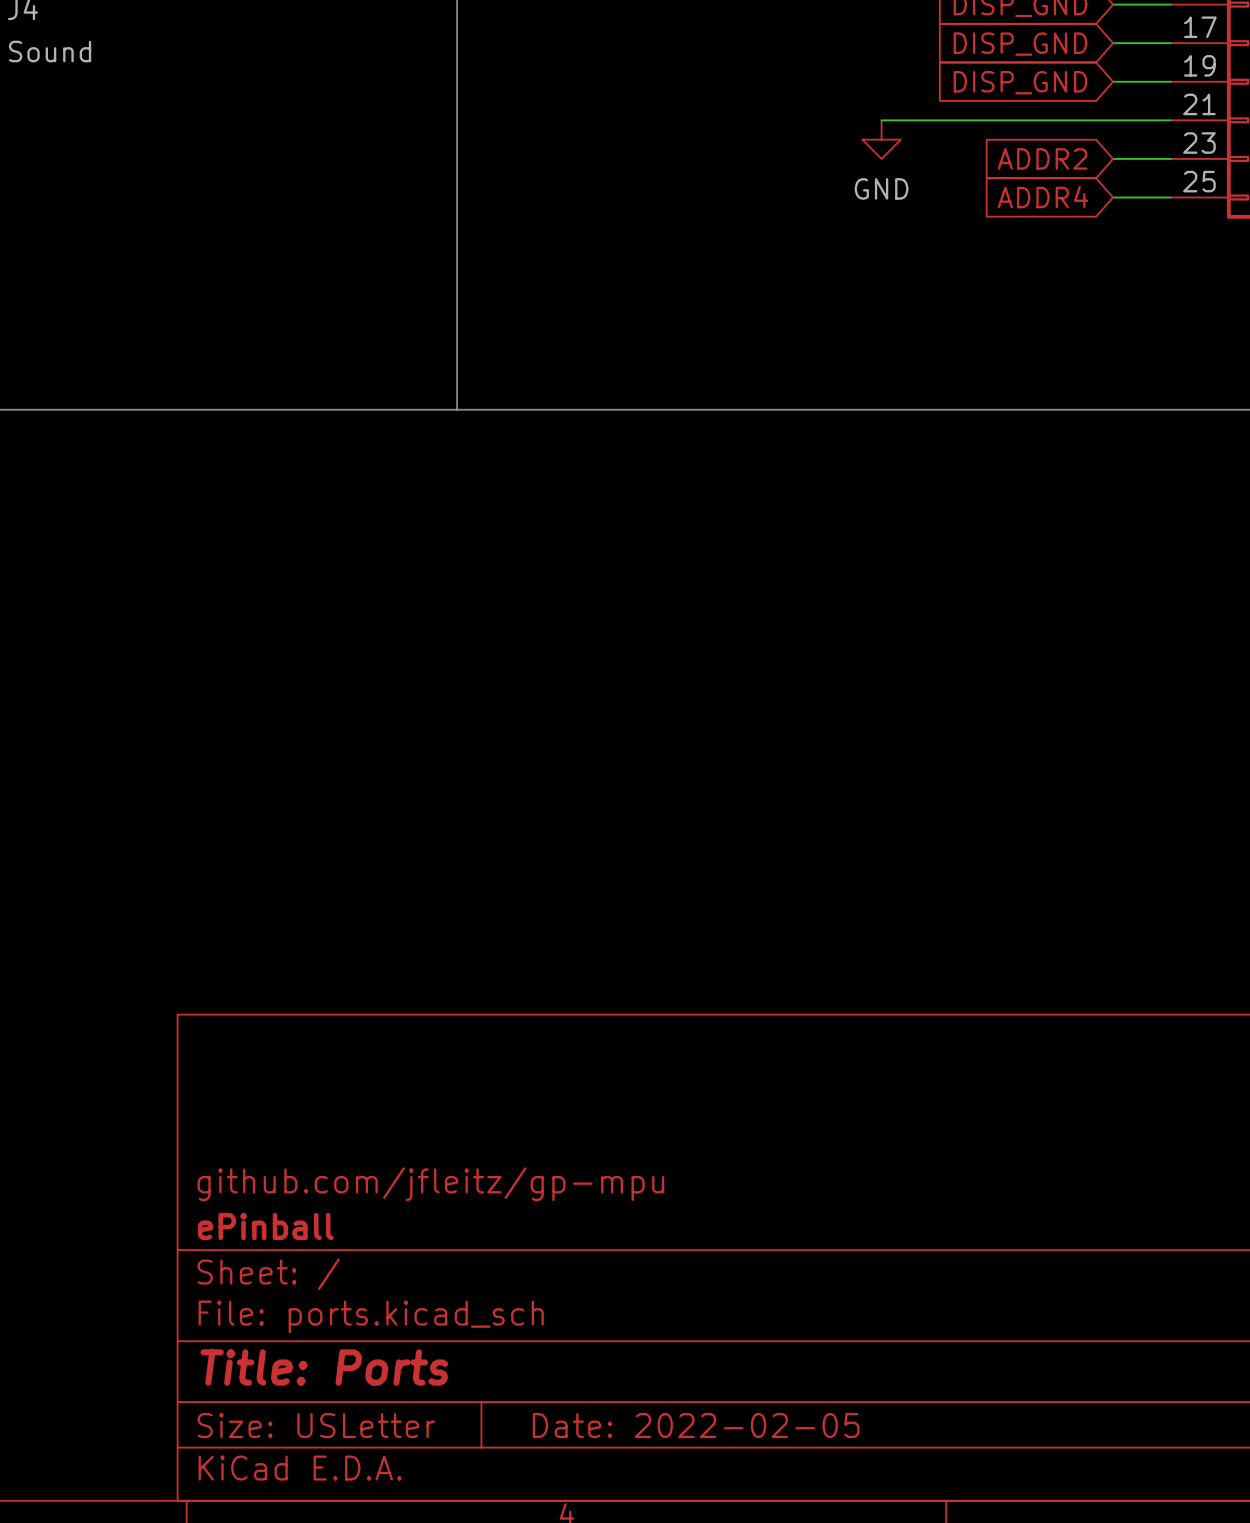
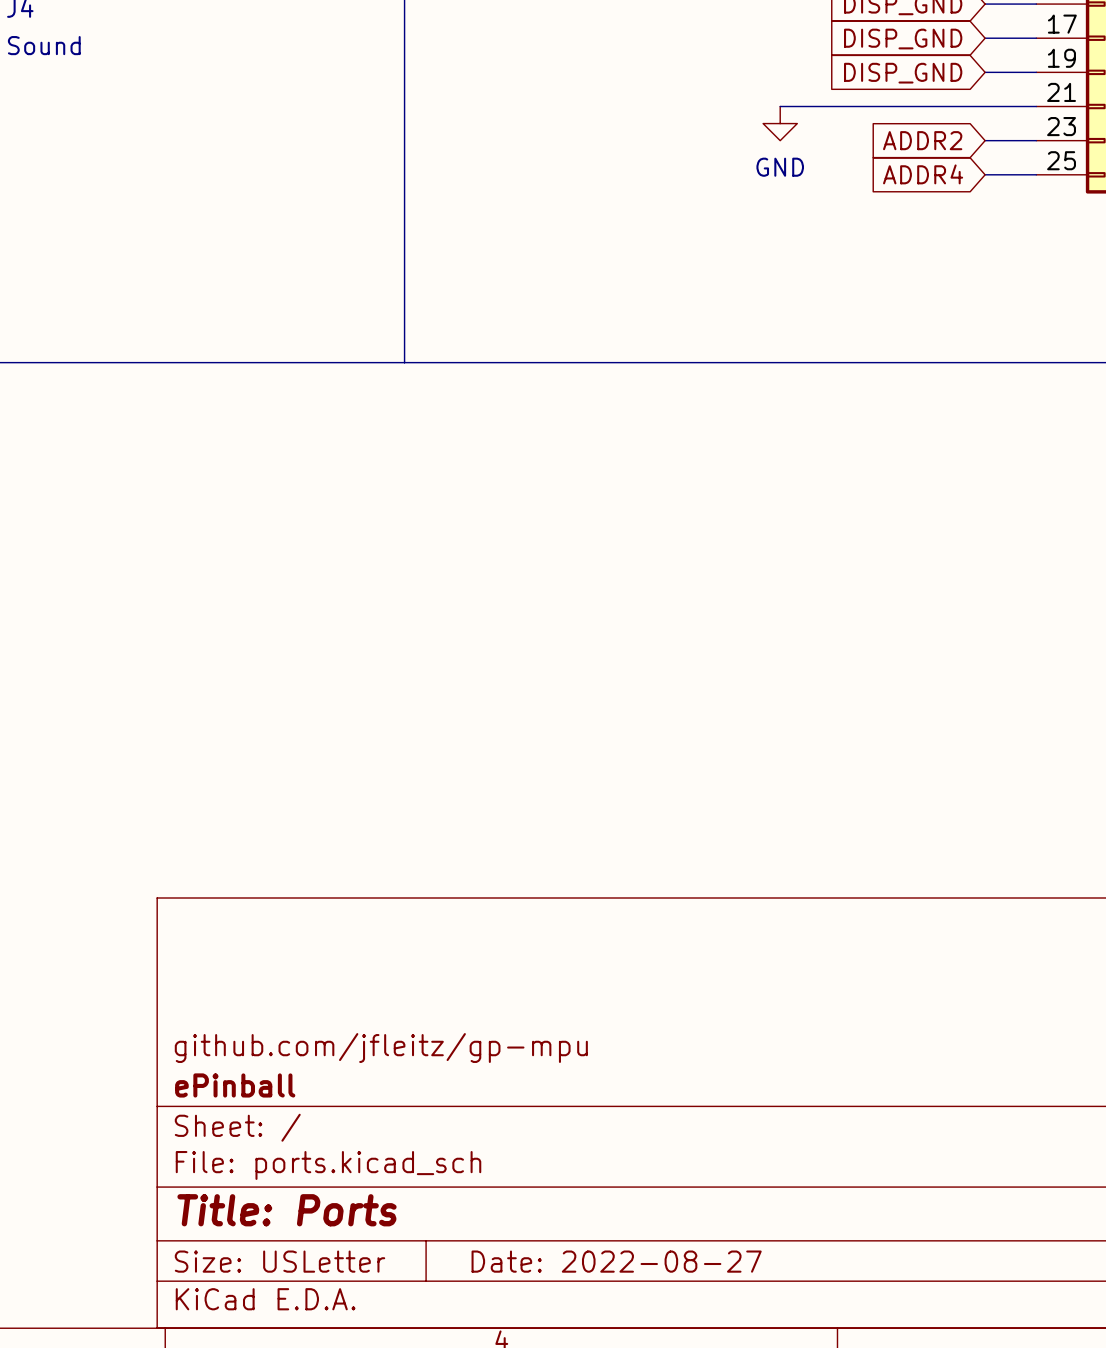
title block: Date: 2022-02-05 (696, 1425) -> Date: 2022-08-27 (616, 1261)

